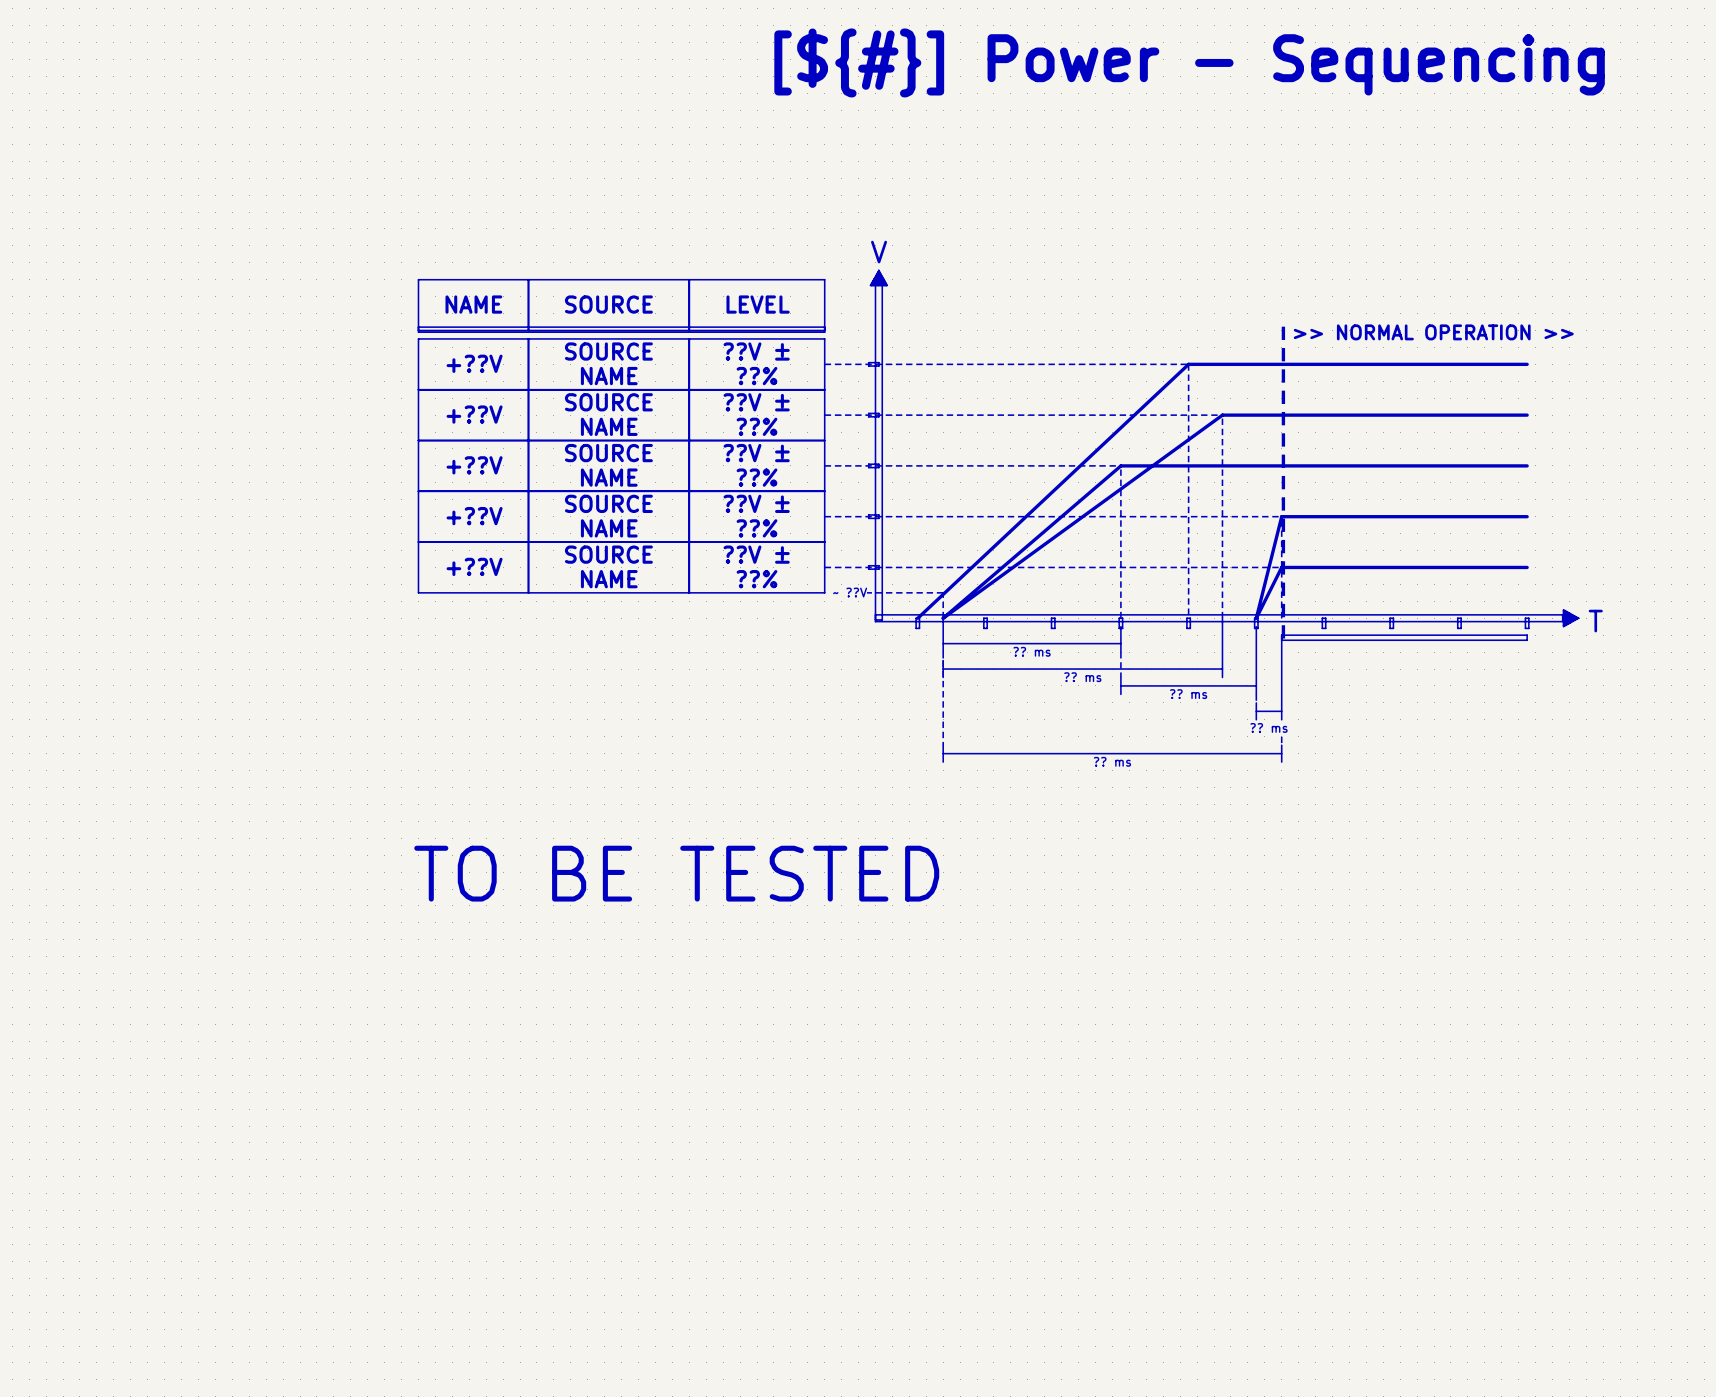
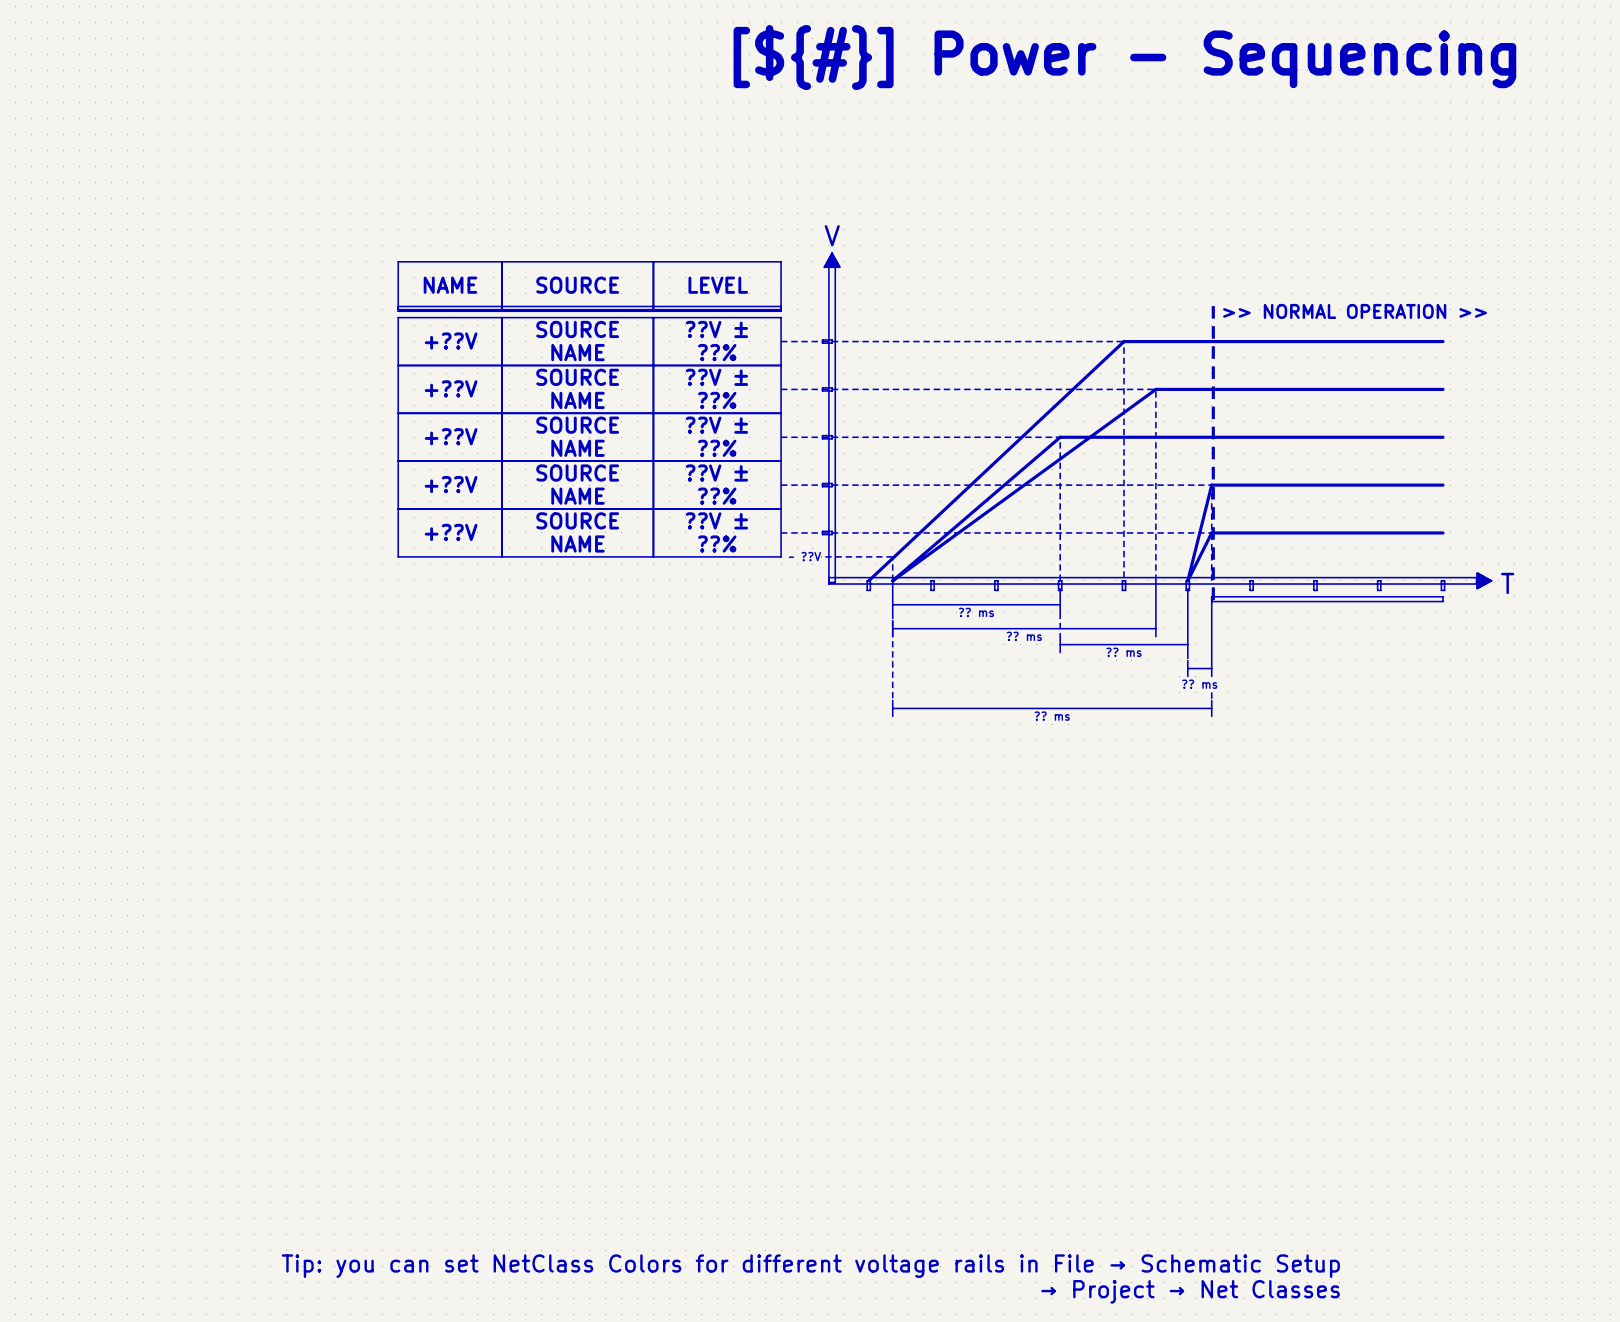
text: TO BE TESTED (676, 873) -> none
text: none -> Tip: you can set NetClass Colors for different voltage rails in File → Schematic Setup (810, 1266)
text: none -> → Project → Net Classes (1190, 1291)

